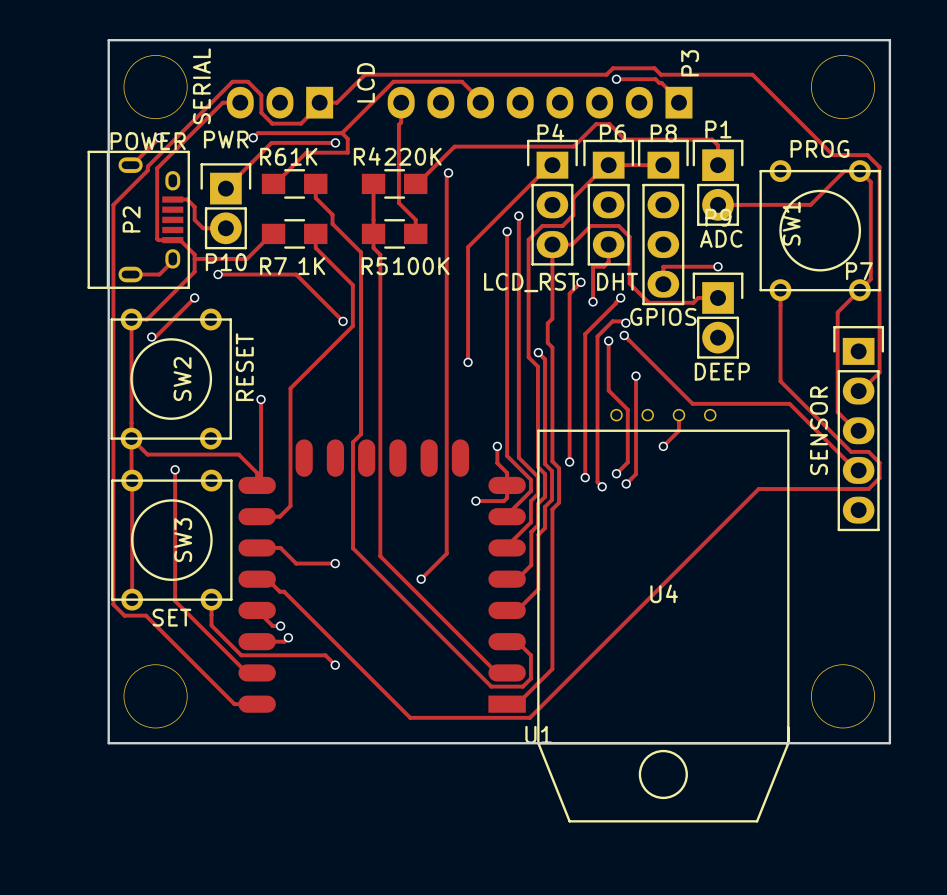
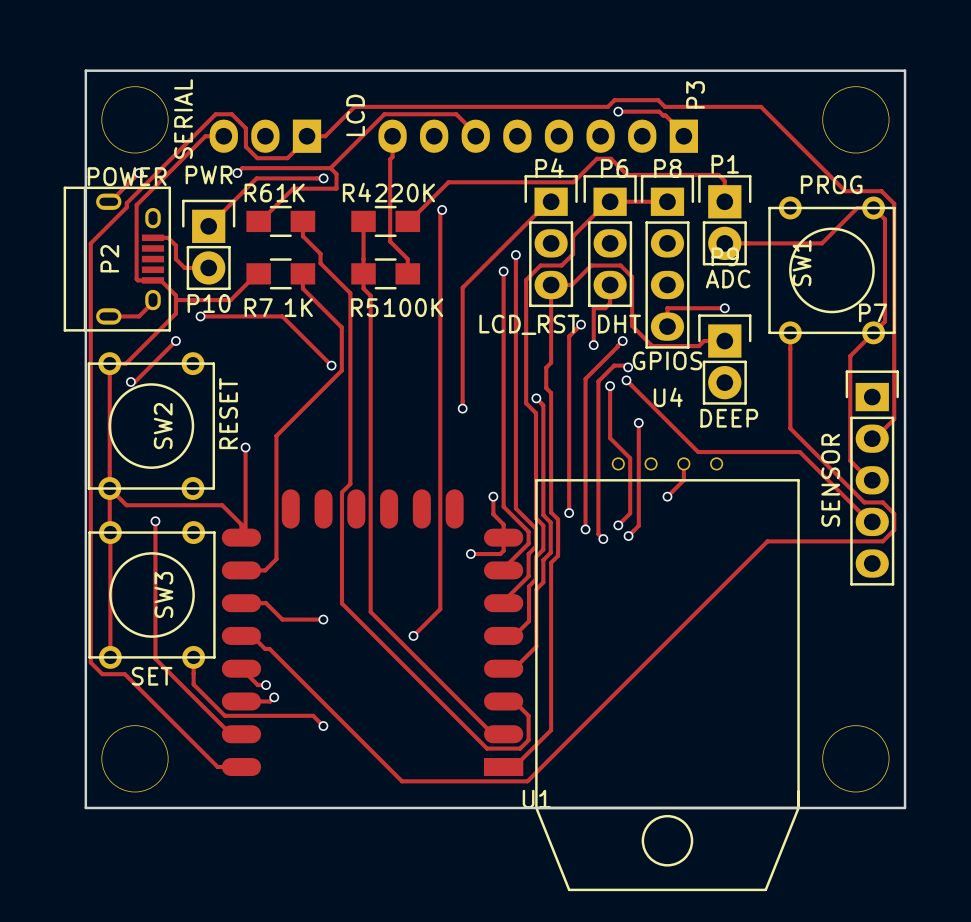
U4 footprint: [537, 408, 790, 823] -> [535, 457, 800, 892]
U4 name position: U4 (664, 593) -> U4 (668, 397)

